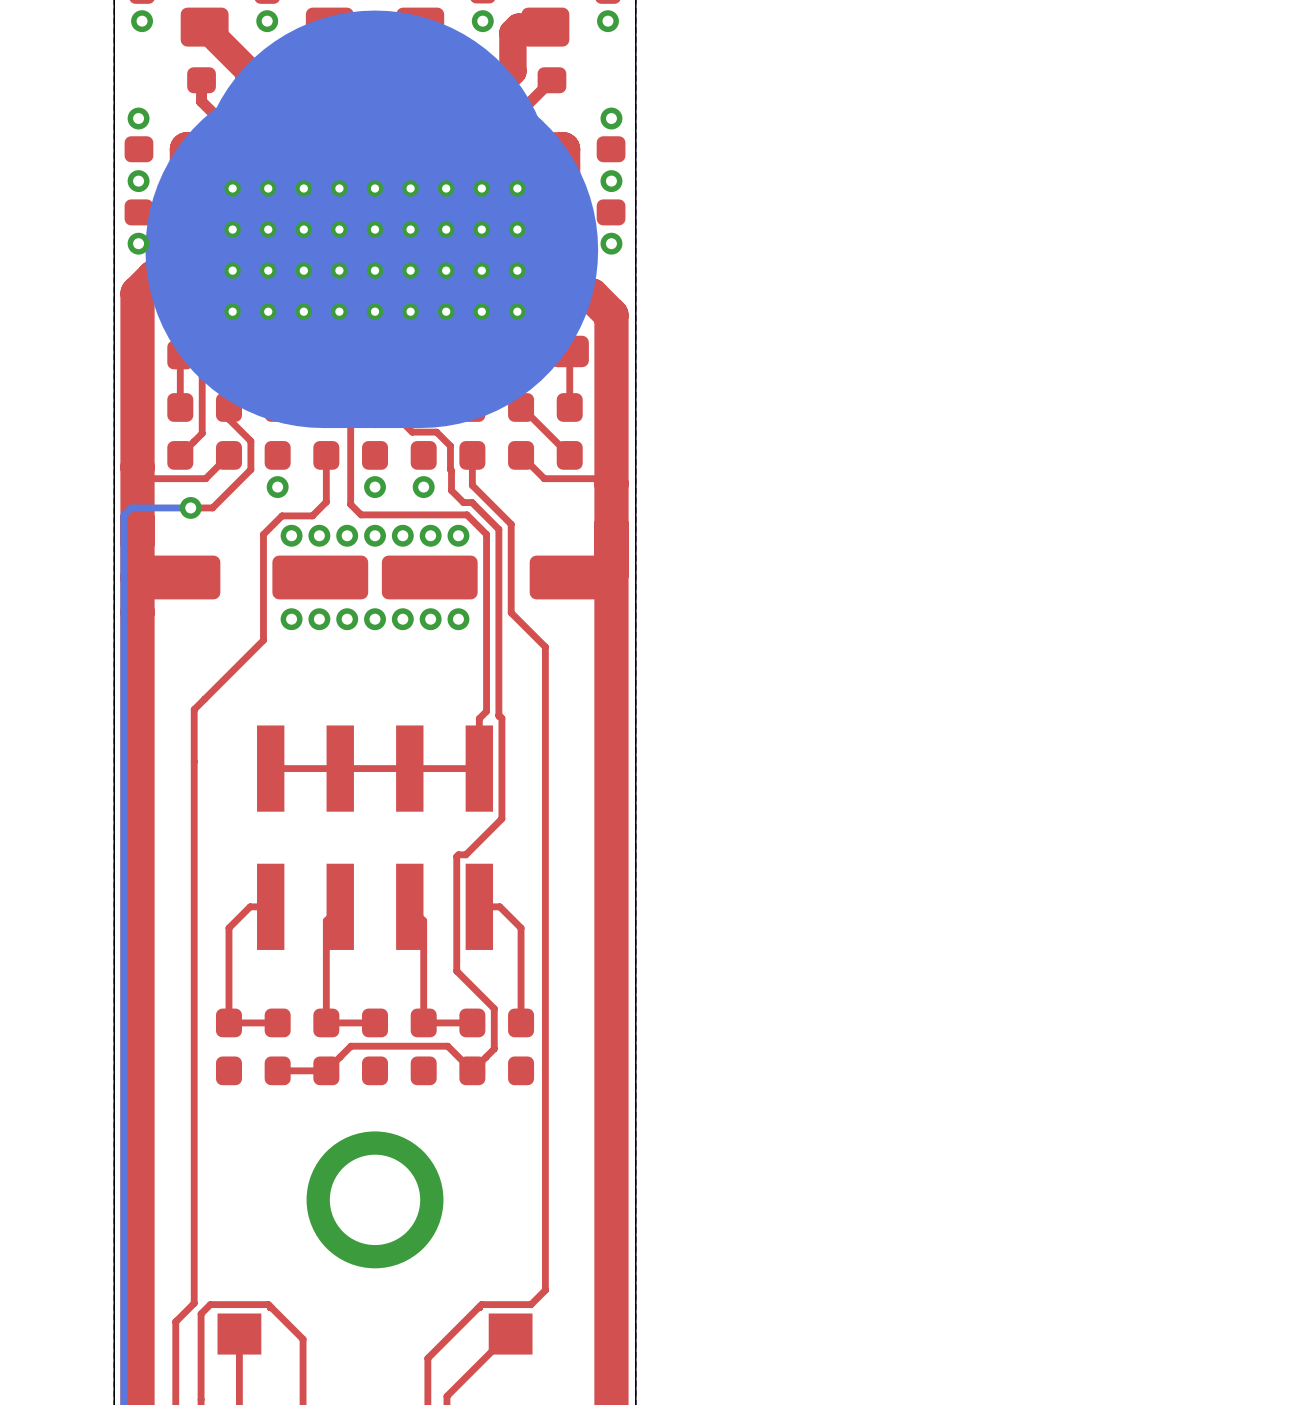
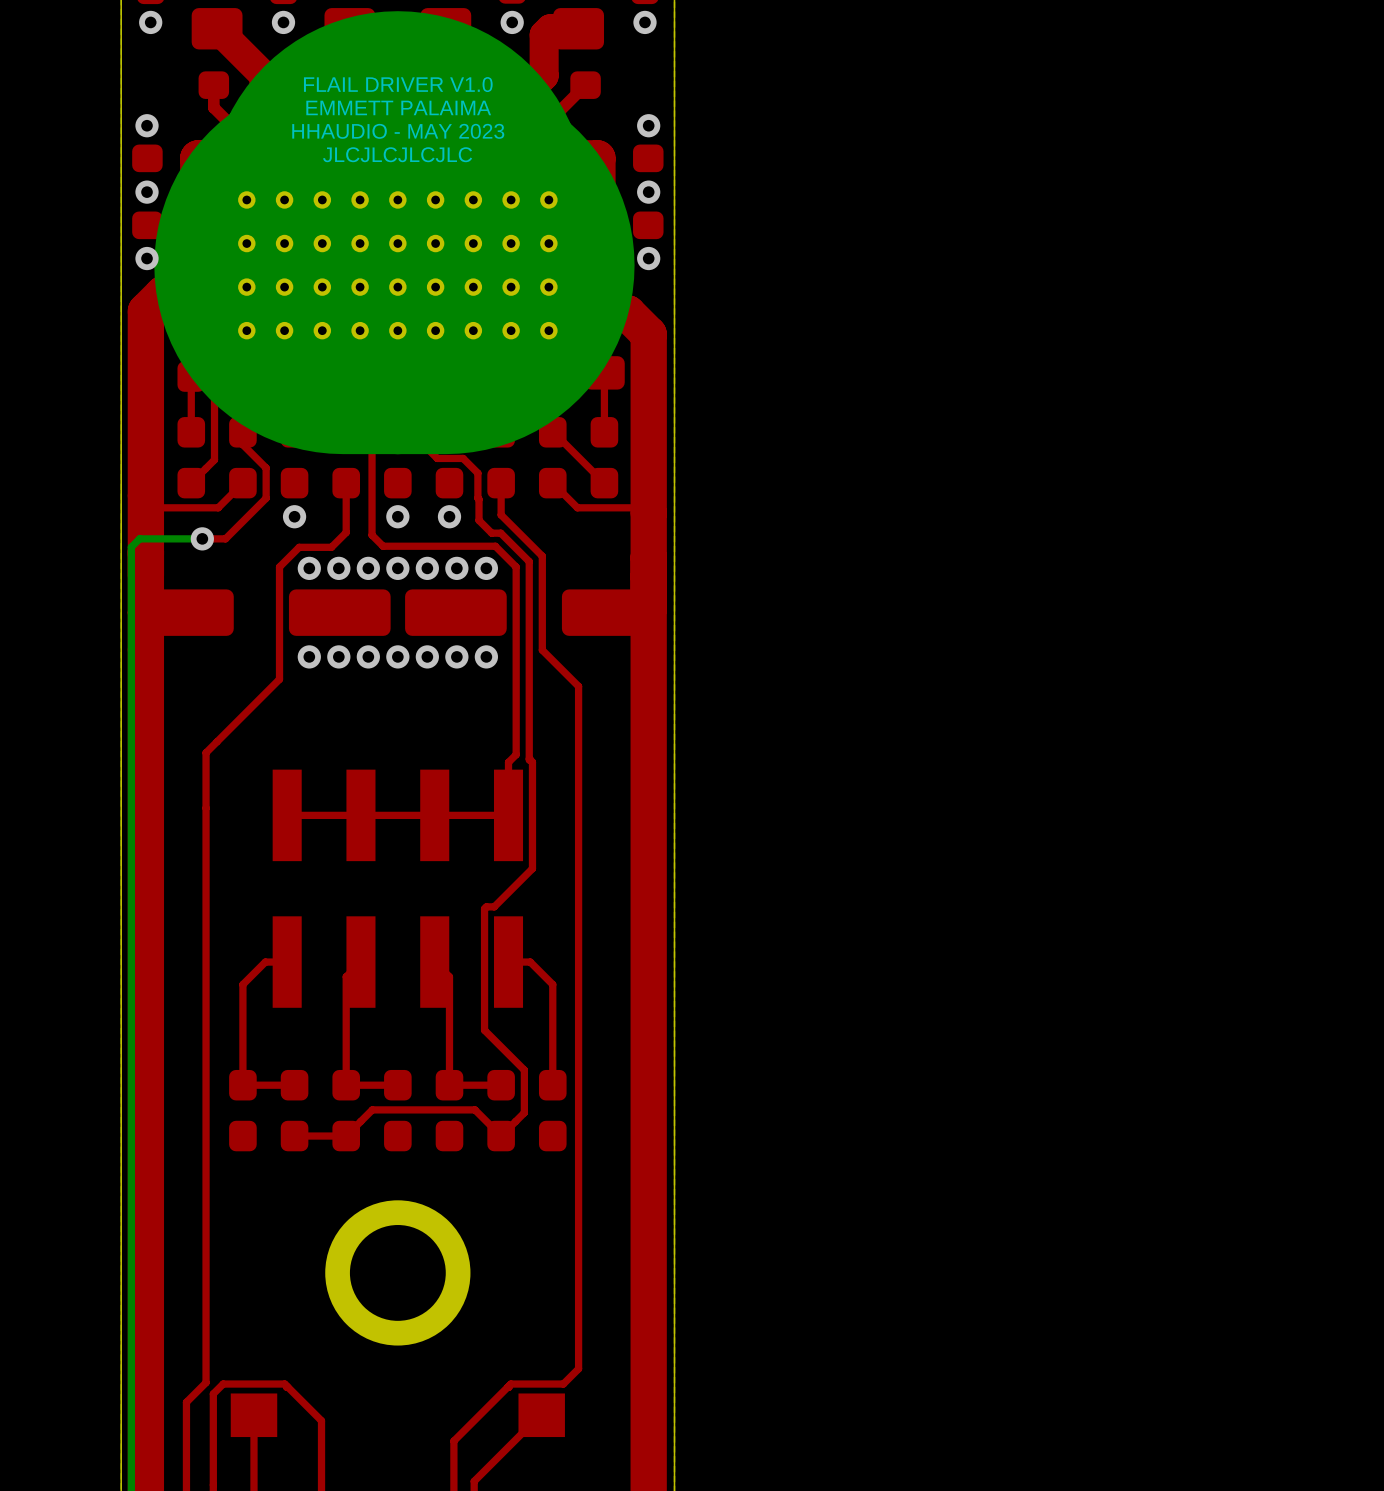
text: none -> FLAIL DRIVER V1.0 (398, 84)
text: none -> EMMETT PALAIMA (398, 107)
text: none -> HHAUDIO - MAY 2023 (398, 131)
text: none -> JLCJLCJLCJLC (397, 154)

